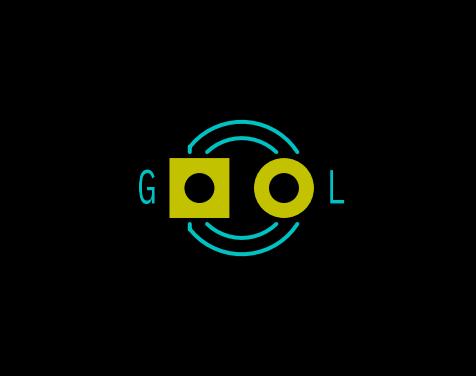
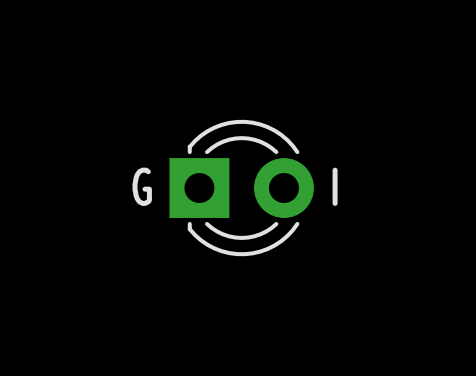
text: L (337, 186) -> I (335, 186)

